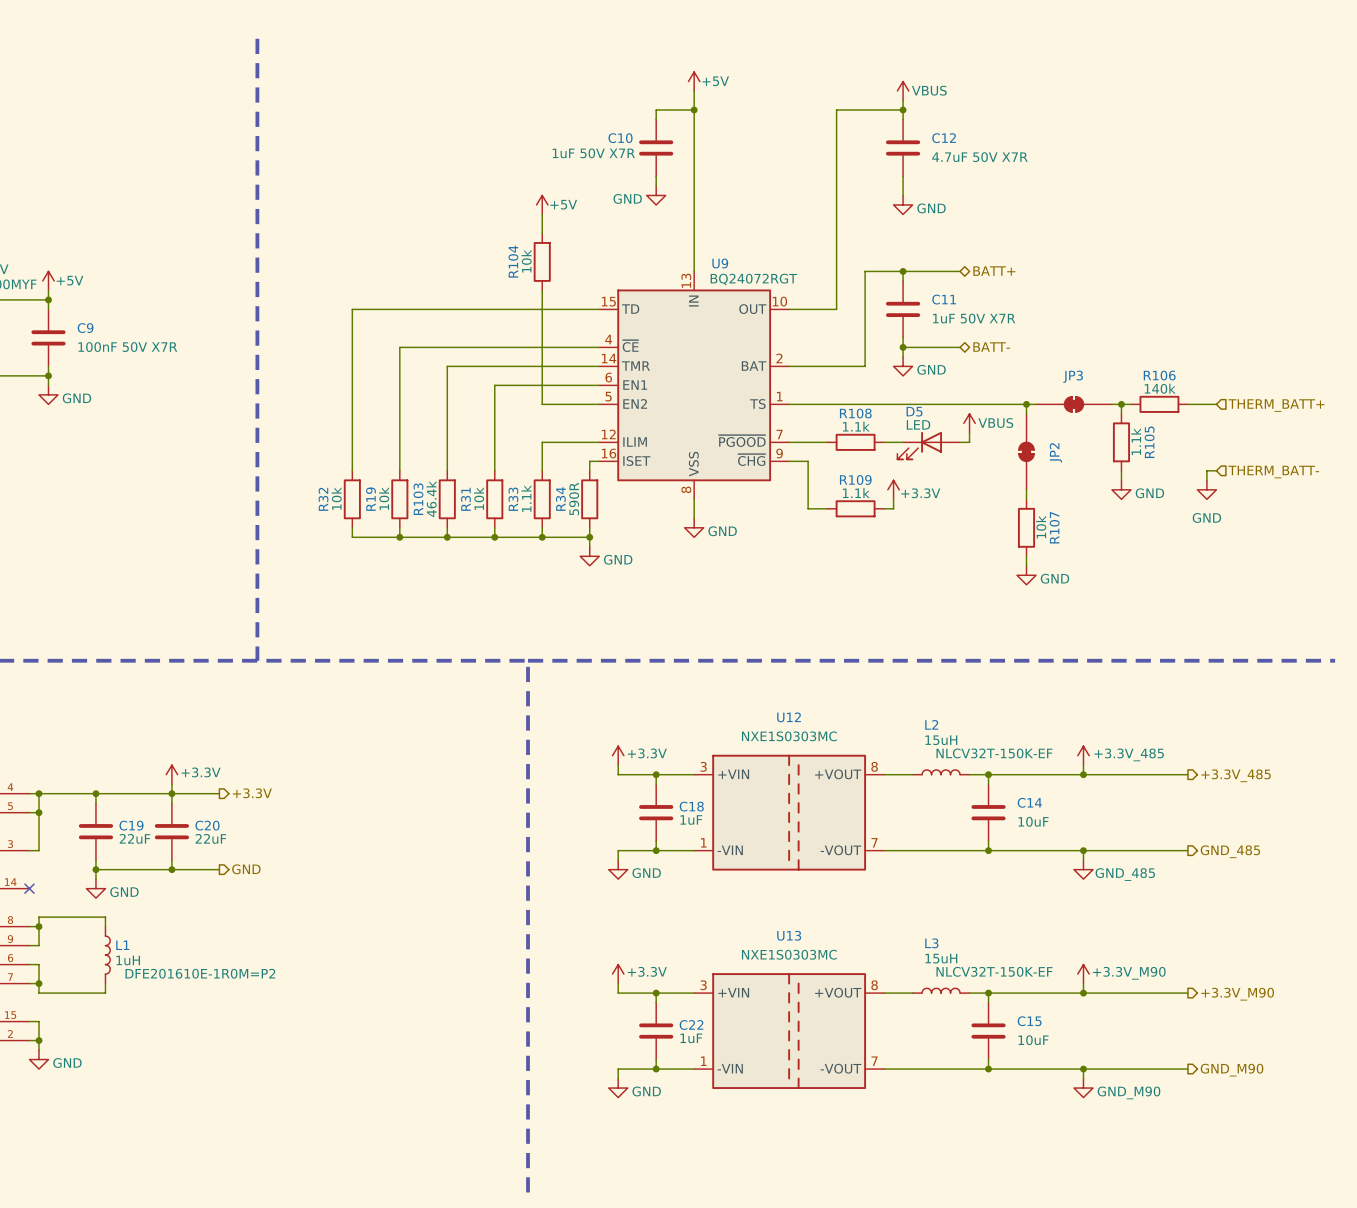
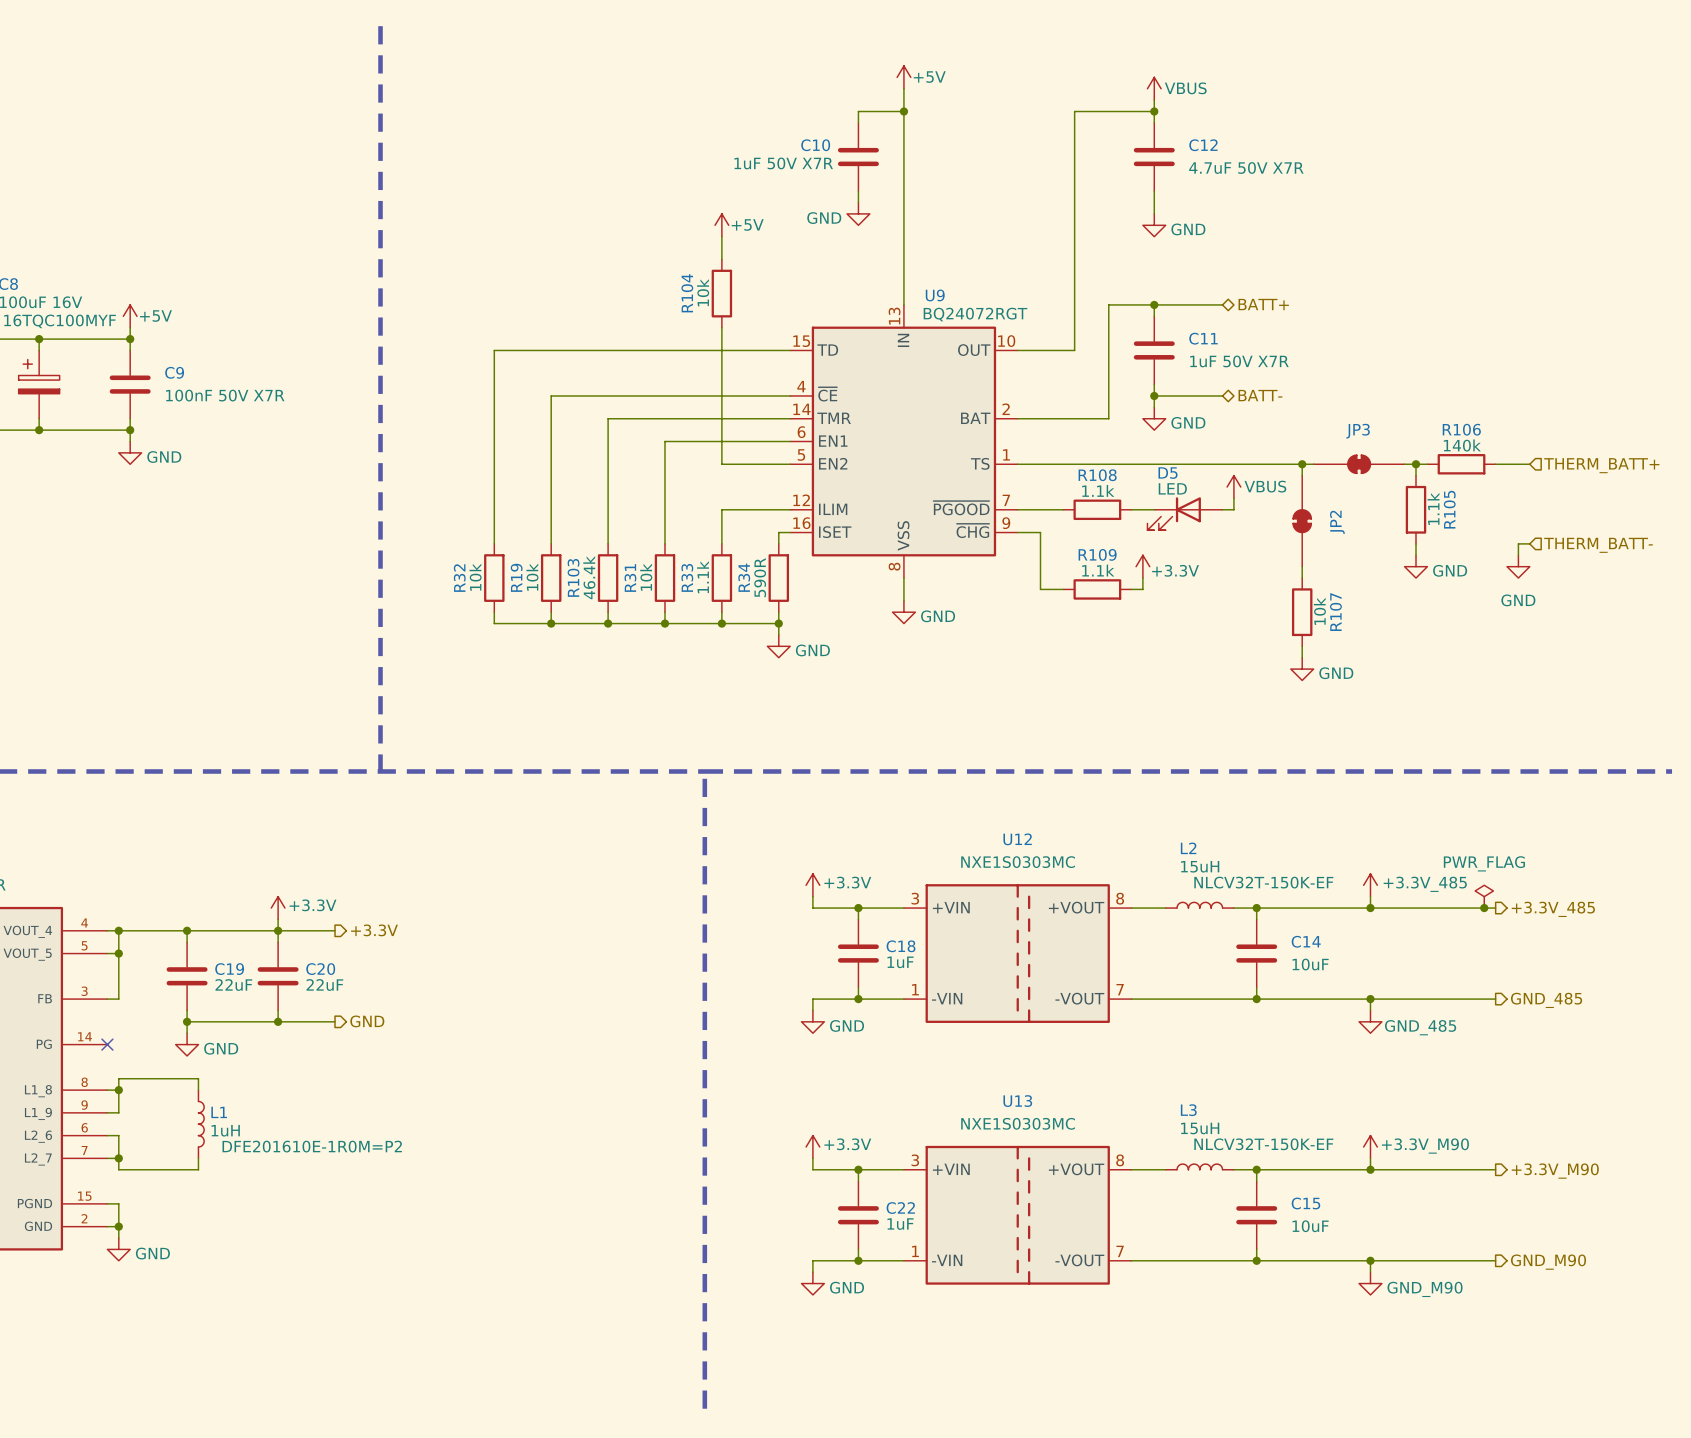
power symbol: none -> PWR_FLAG (1484, 896)
junction: none -> (1484, 908)

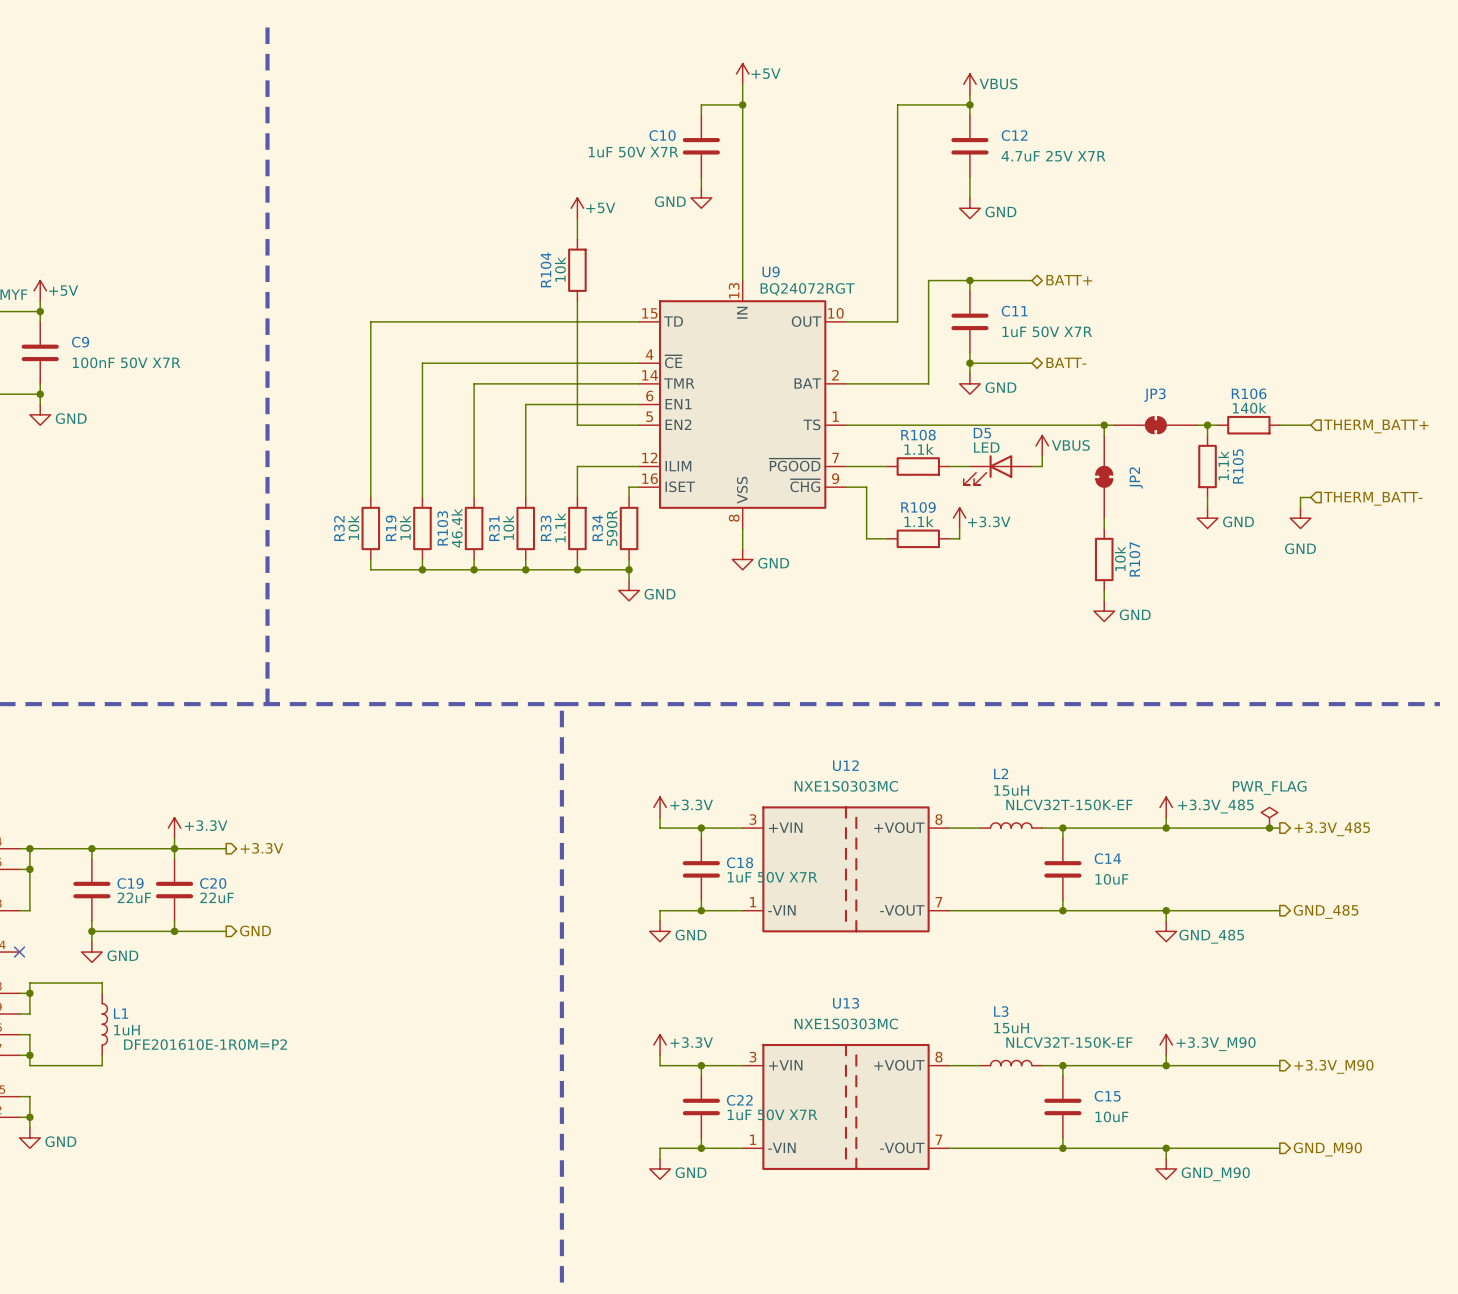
C12 value: 4.7uF 50V X7R (1246, 167) -> 4.7uF 25V X7R (1053, 156)
C18 value: 1uF (900, 962) -> 1uF 50V X7R (772, 877)
C22 value: 1uF (900, 1224) -> 1uF 50V X7R (772, 1114)

